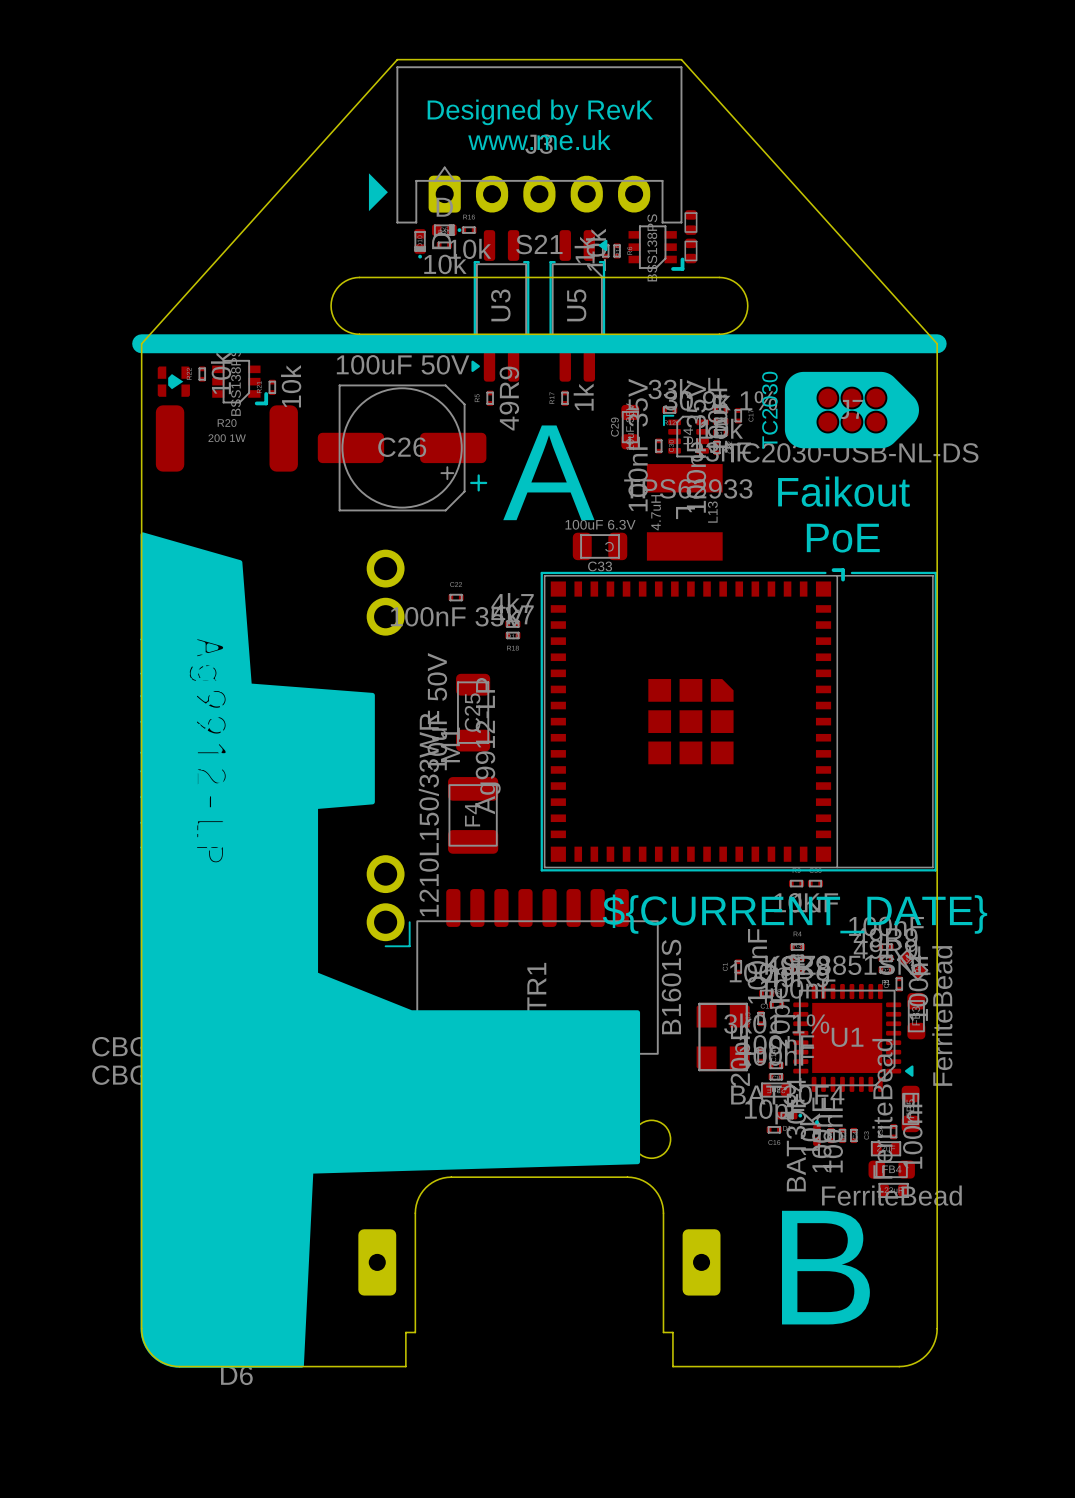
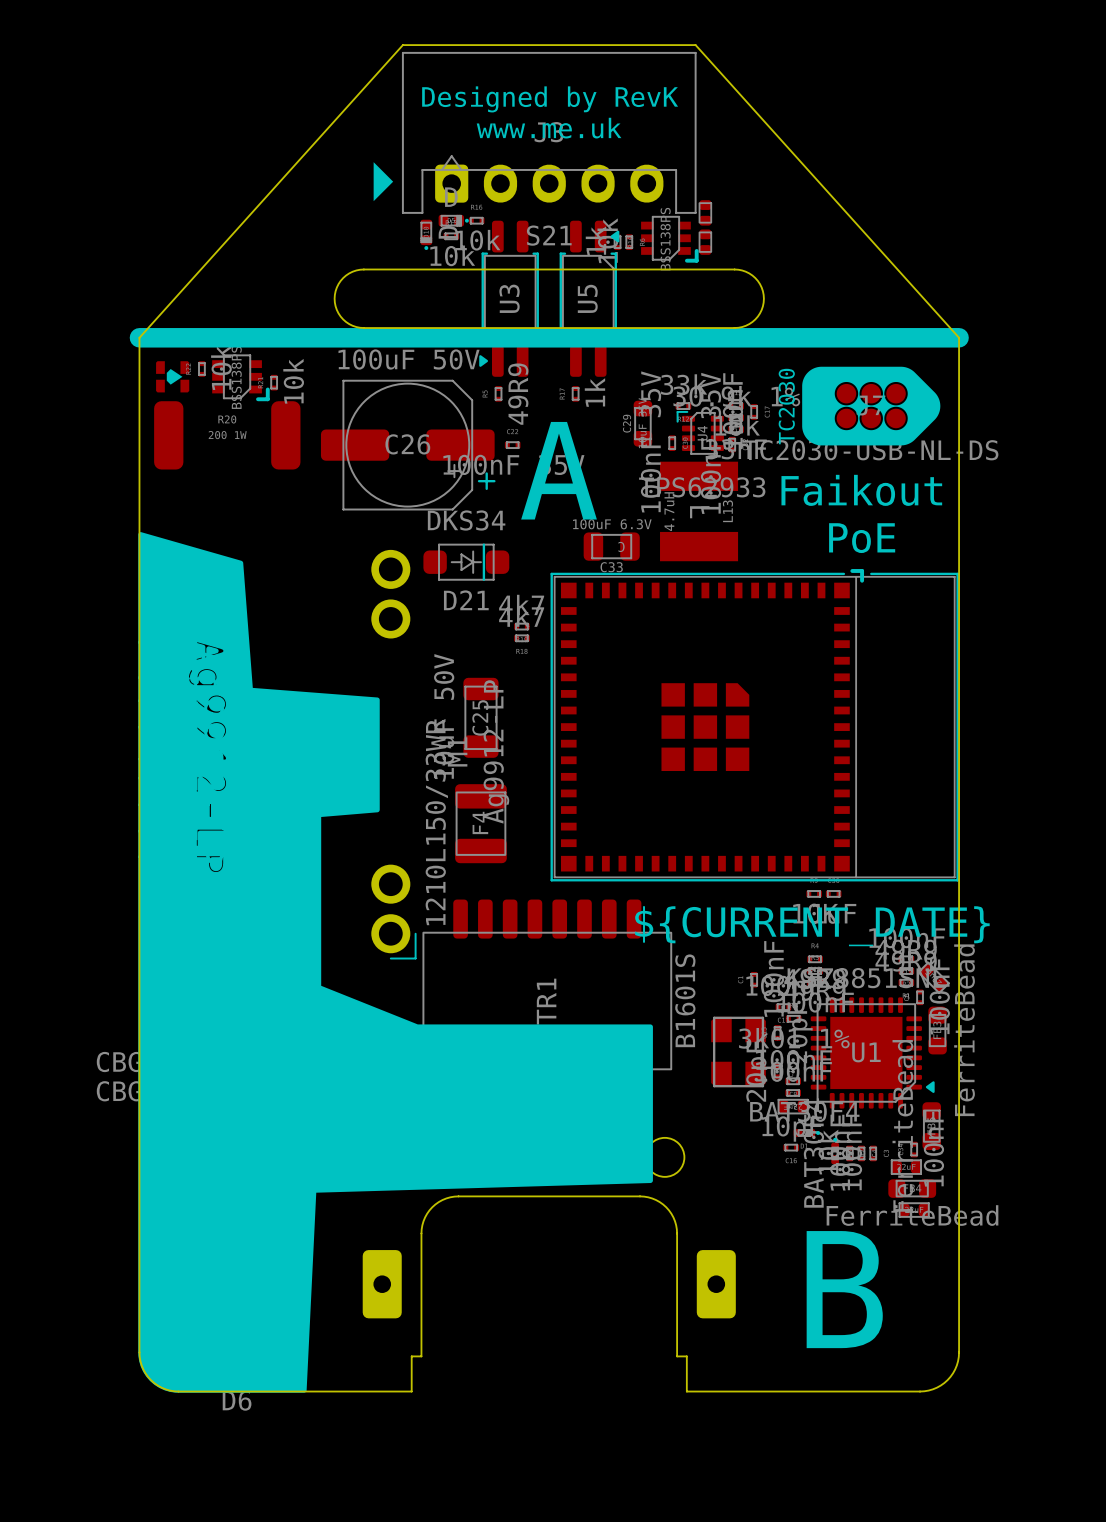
D21: none -> DKS34 (466, 562)
part position: (456, 597) -> (512, 445)

